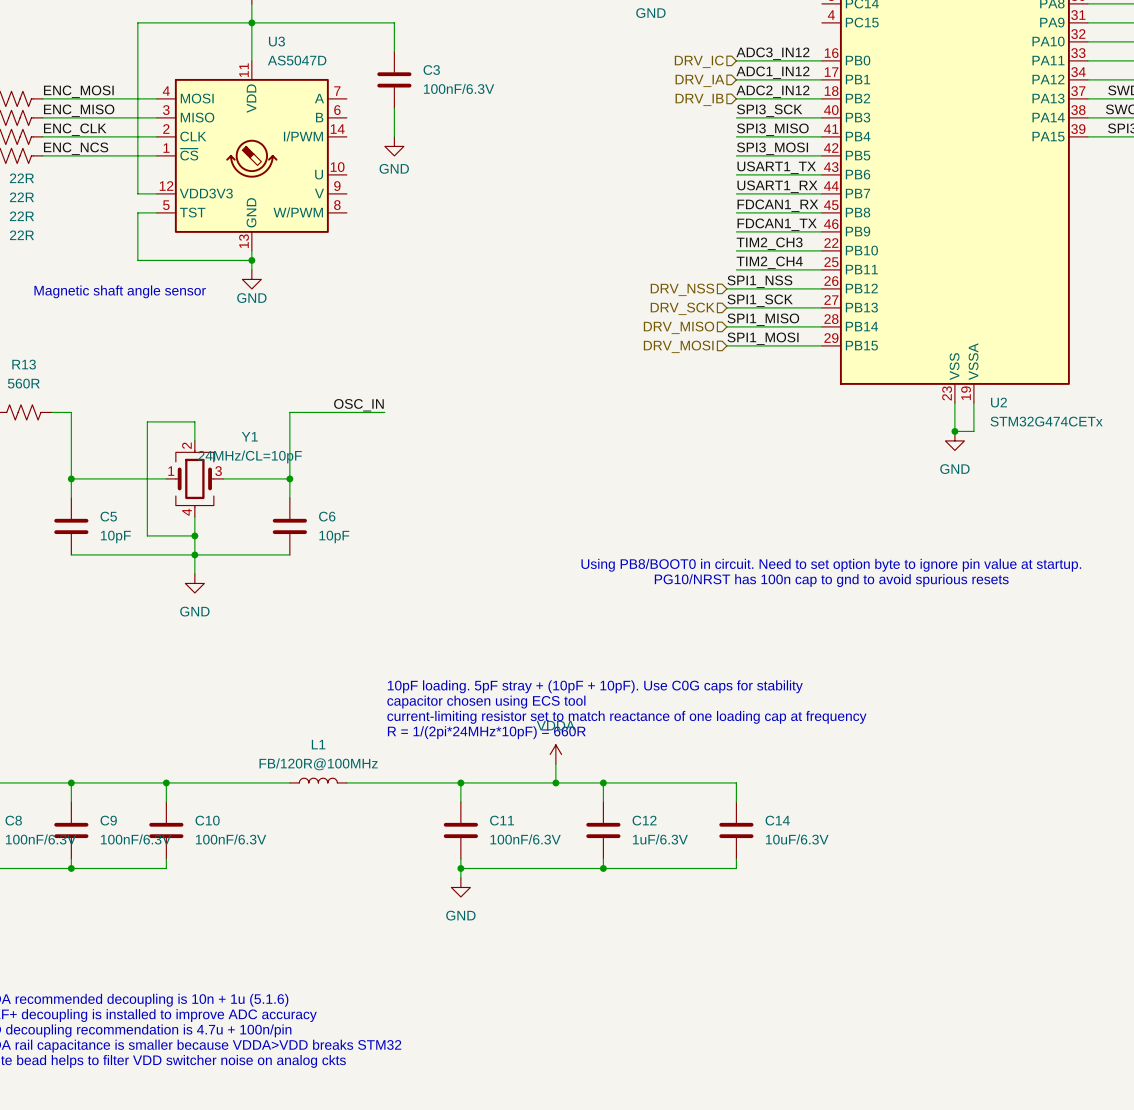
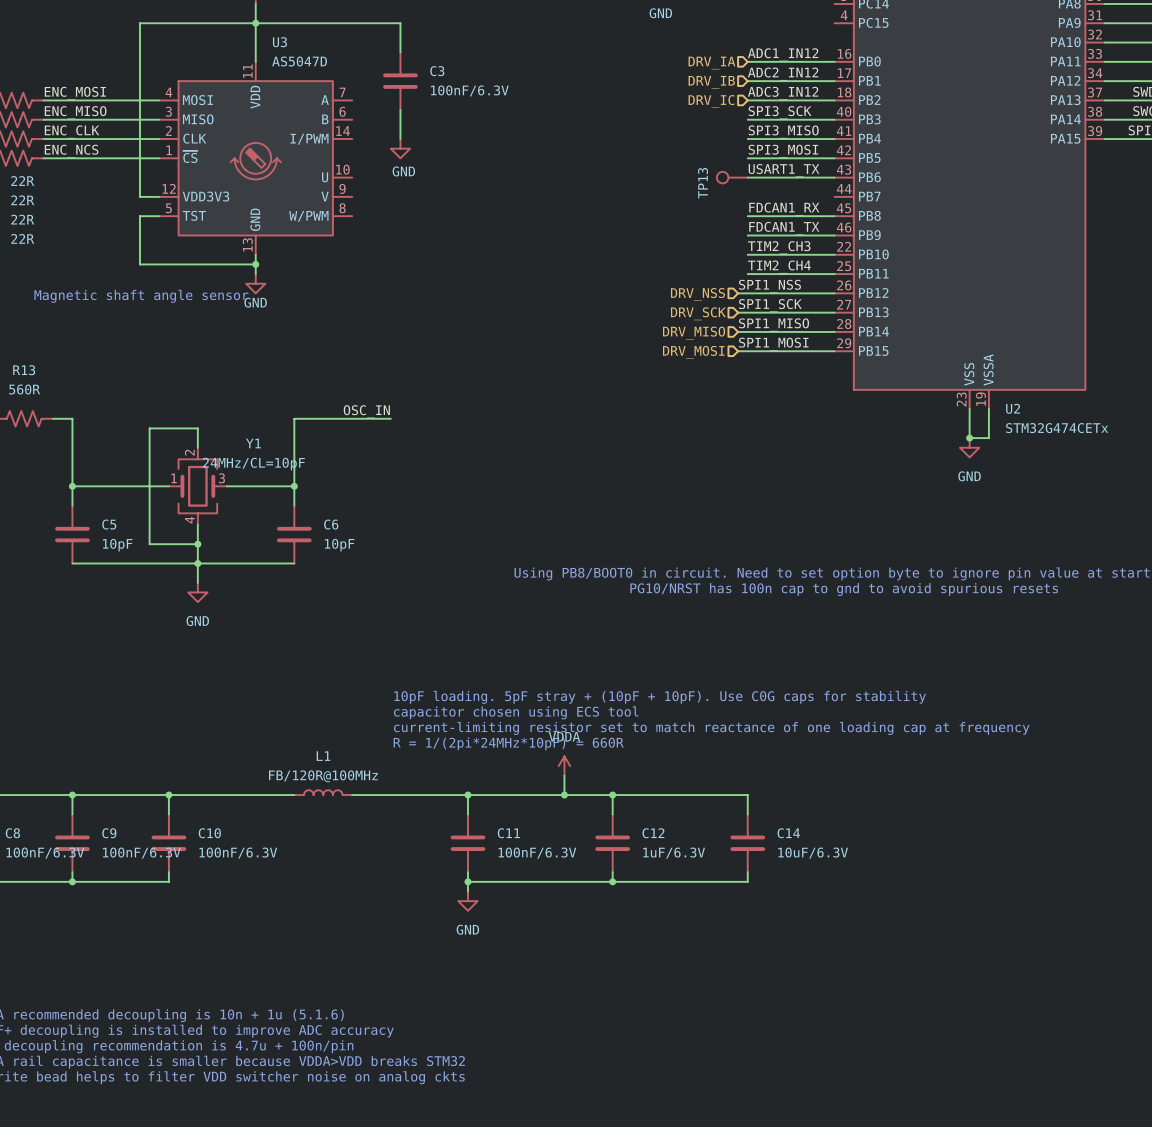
label: ADC3_IN12 (772, 53) -> ADC1_IN12 (783, 54)
hierarchical label: DRV_IC (699, 61) -> DRV_IA (711, 63)
label: ADC1_IN12 (772, 72) -> ADC2_IN12 (783, 74)
hierarchical label: DRV_IA (699, 80) -> DRV_IB (711, 82)
label: ADC2_IN12 (772, 91) -> ADC3_IN12 (783, 93)
hierarchical label: DRV_IB (699, 99) -> DRV_IC (711, 101)
TP13: none -> (732, 177)
label: USART1_RX (777, 186) -> none
wire: (736, 193) (821, 193) -> none

